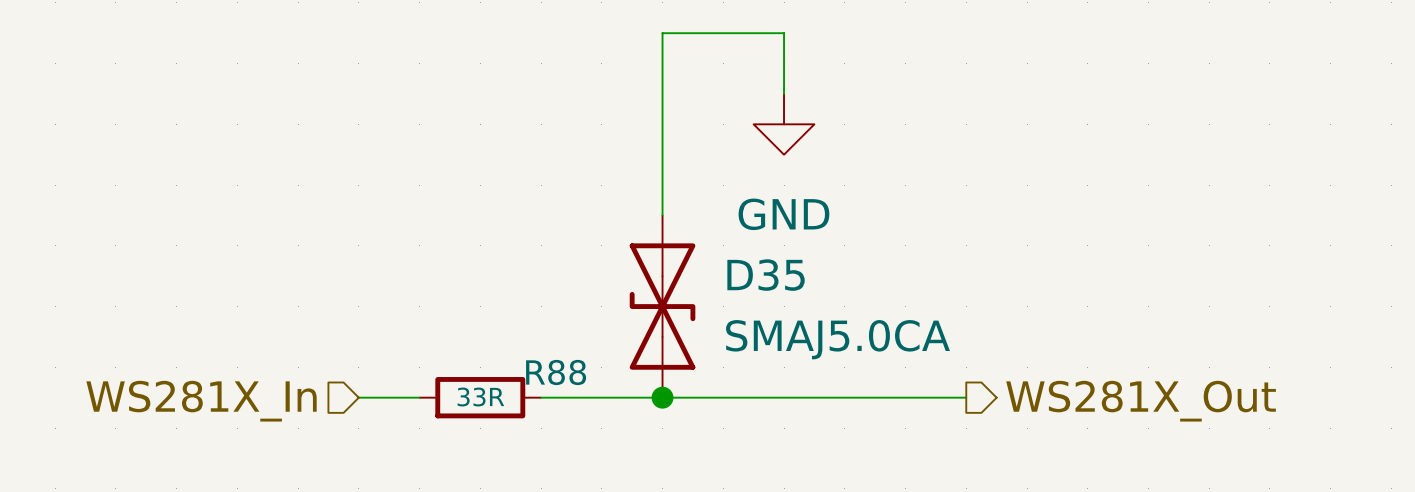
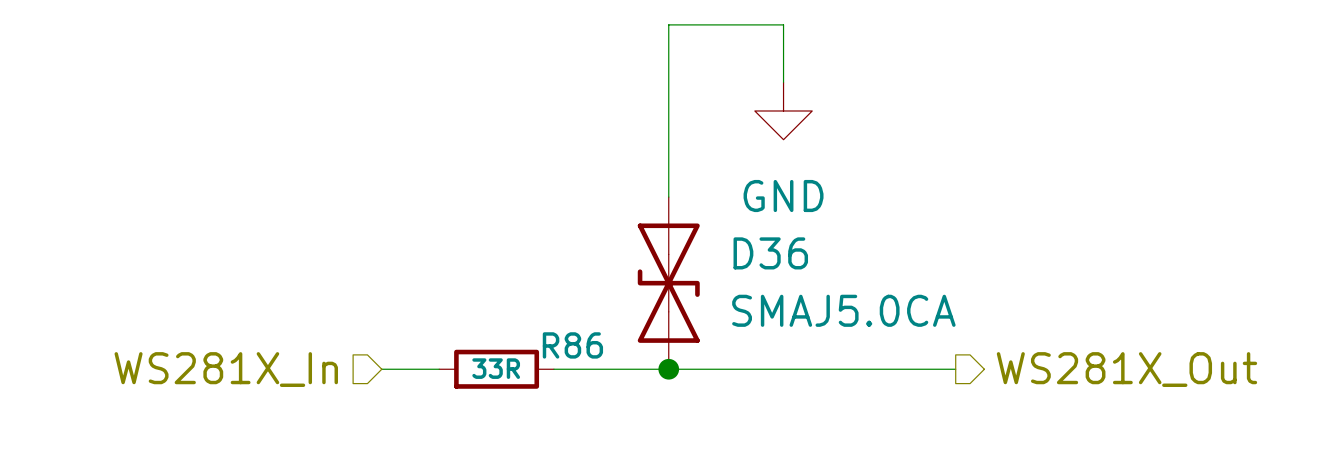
D35 name: D35 (766, 275) -> D36 (770, 253)
R88 name: R88 (556, 372) -> R86 (572, 345)

